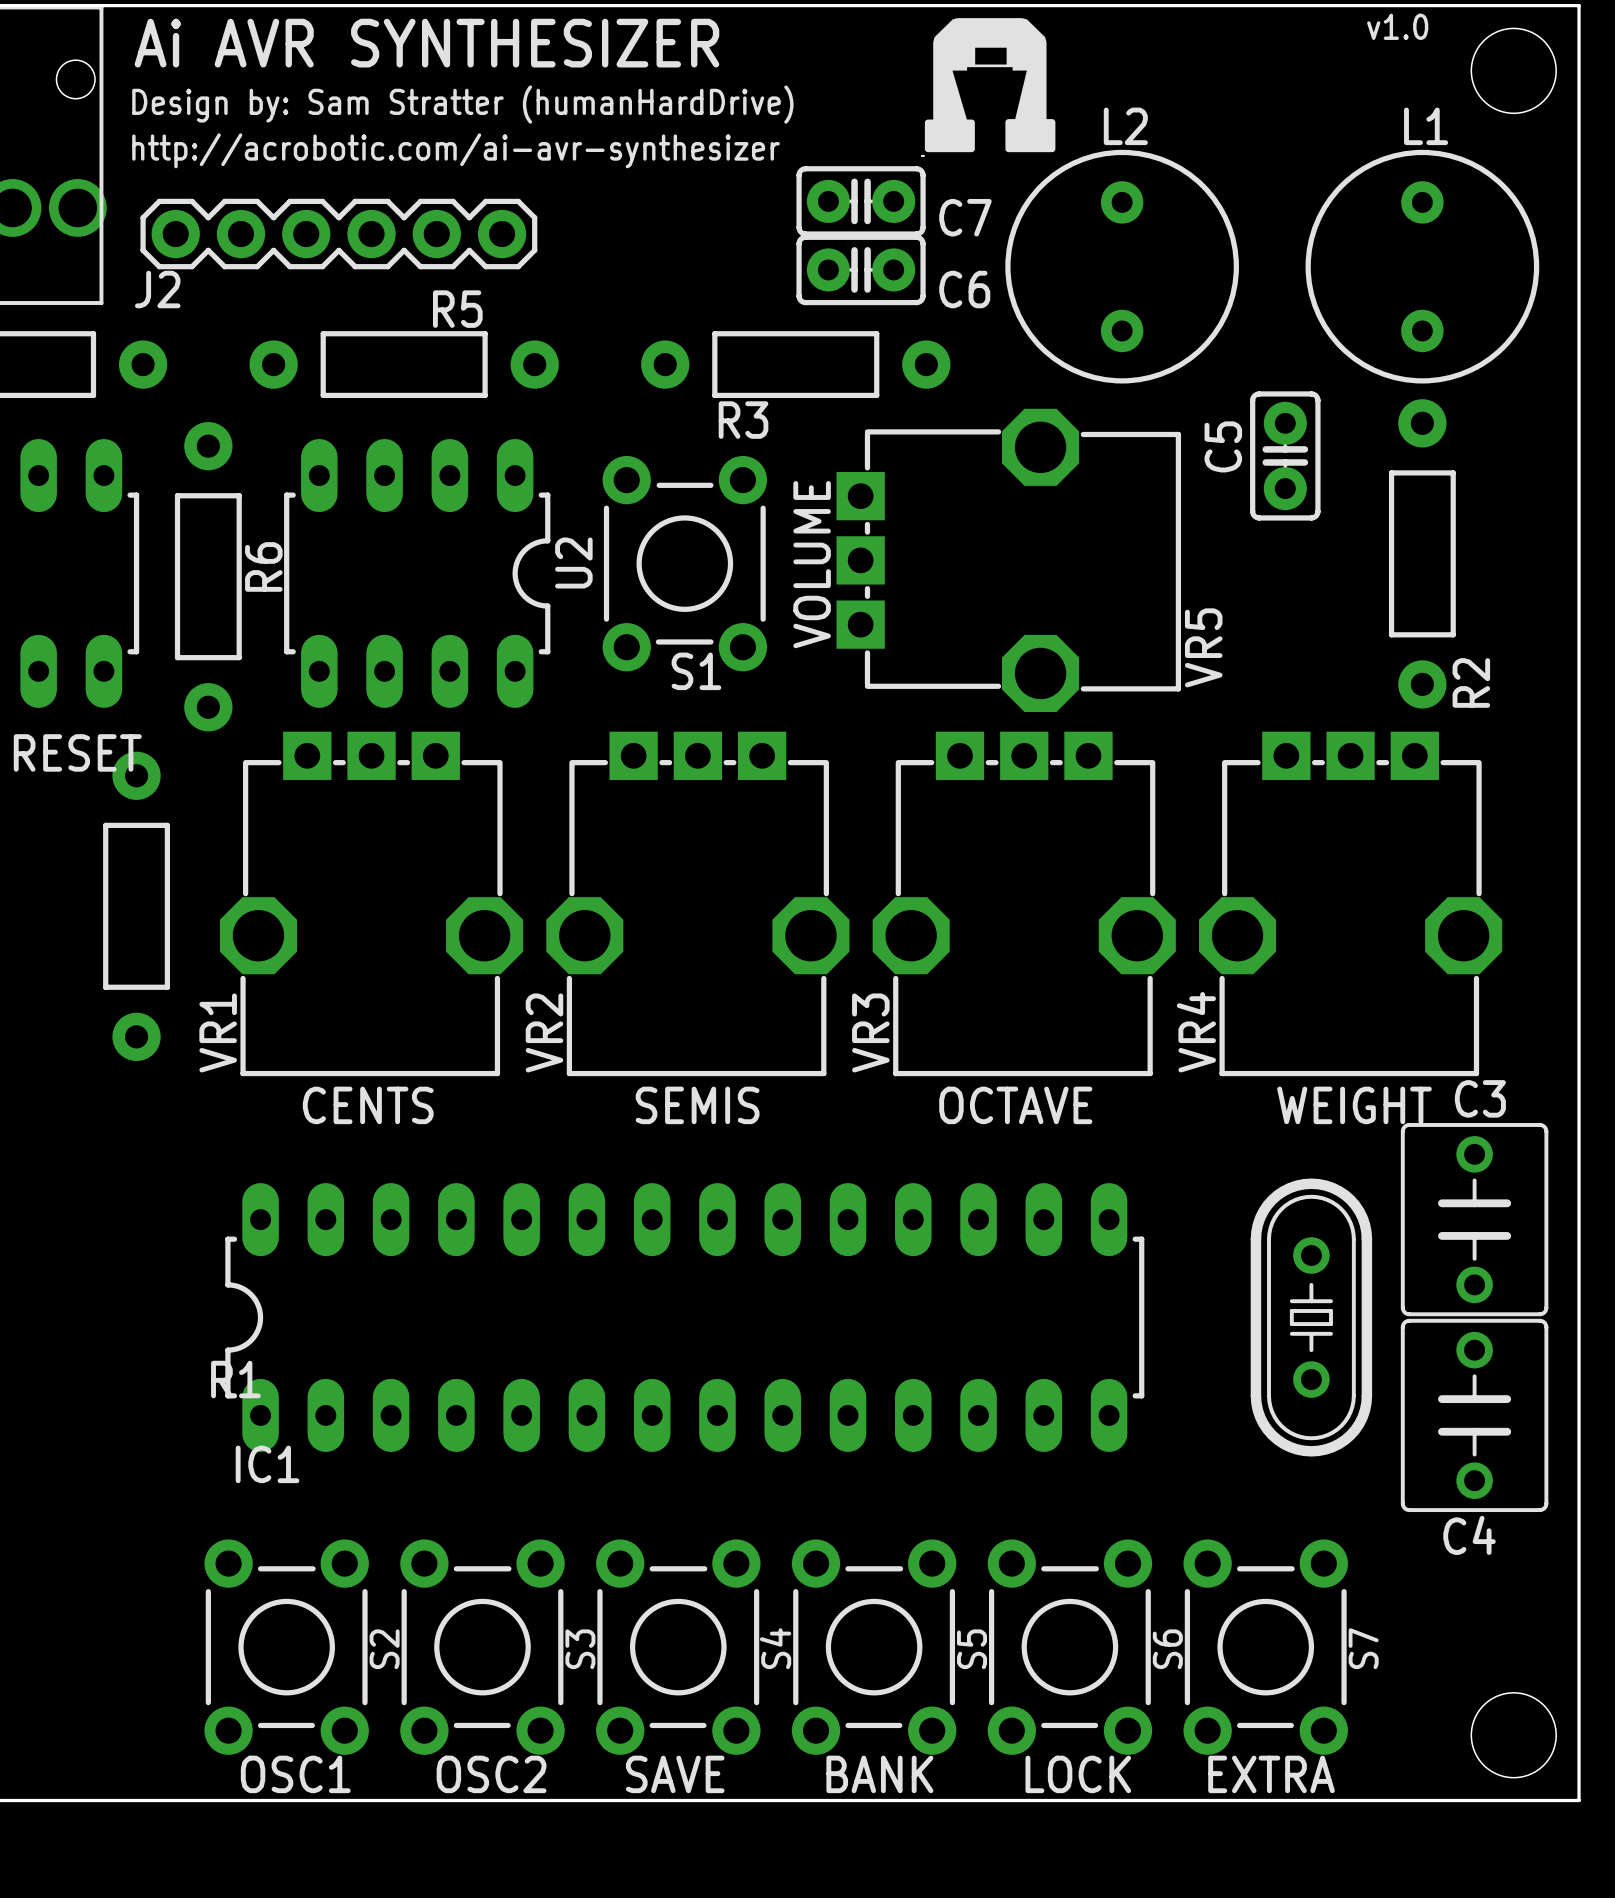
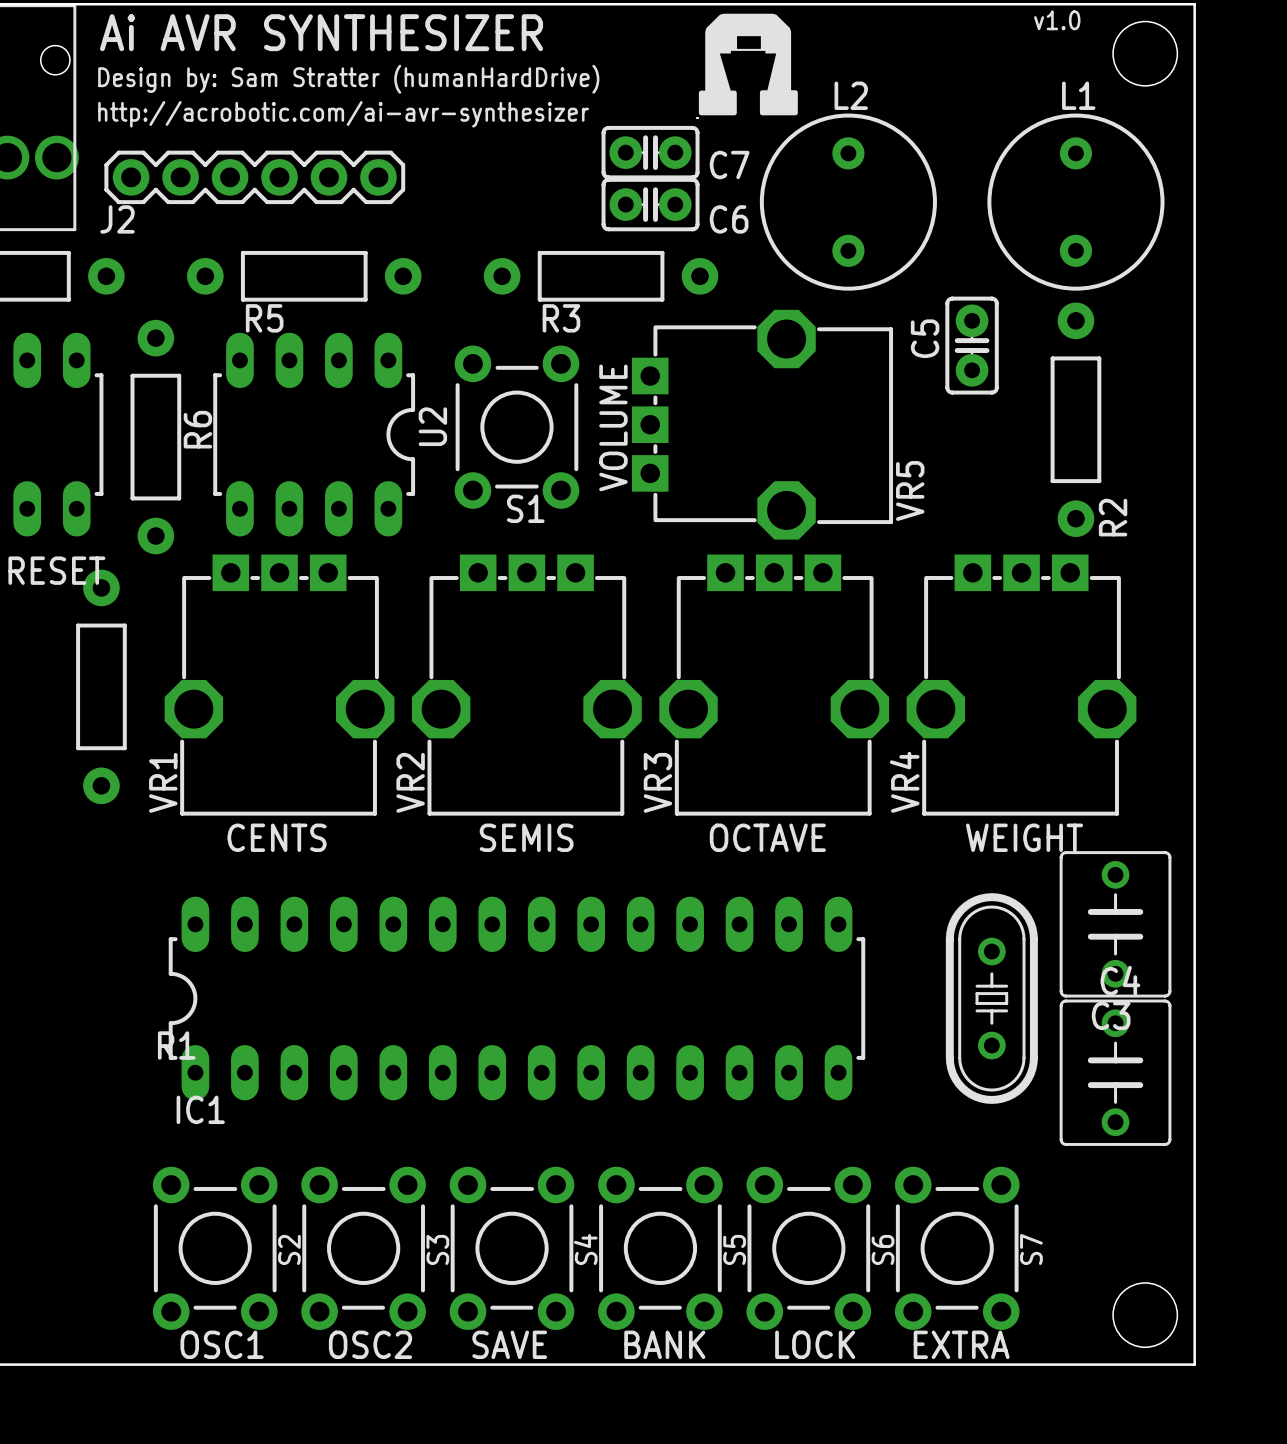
R5 name position: R5 (457, 309) -> R5 (264, 318)
C3 name position: C3 (1480, 1098) -> C3 (1111, 1015)
C4 name position: C4 (1469, 1535) -> C4 (1120, 980)

